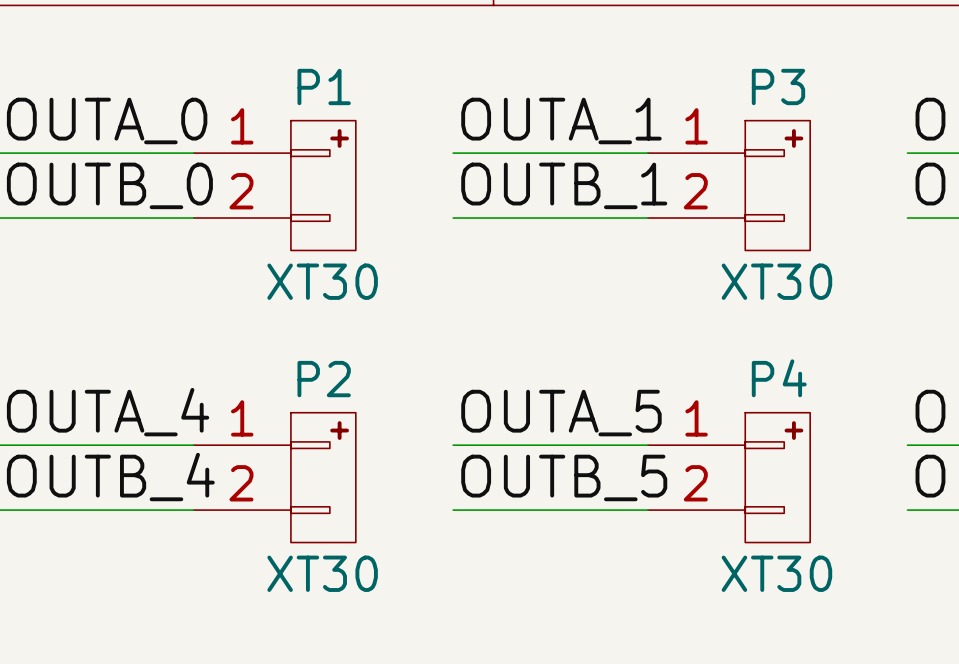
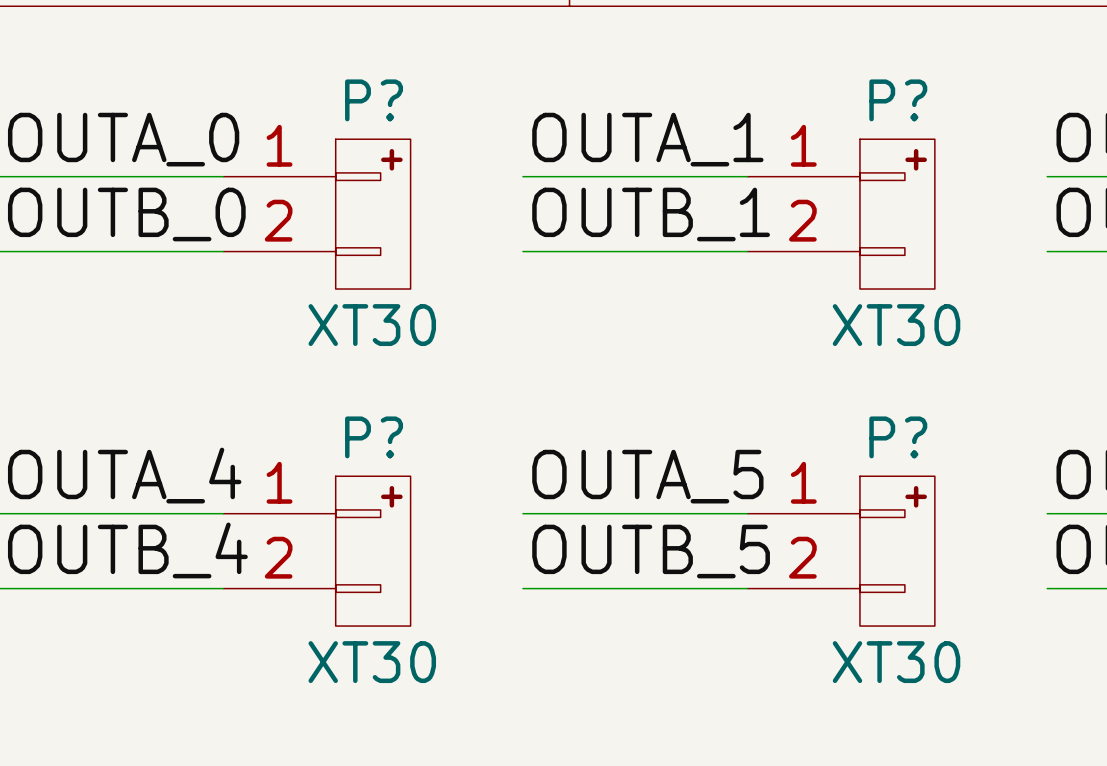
P1 name: P1 (324, 86) -> P? (374, 100)
P3 name: P3 (778, 86) -> P? (898, 100)
P4 name: P4 (779, 378) -> P? (898, 437)
P2 name: P2 (324, 379) -> P? (374, 437)

